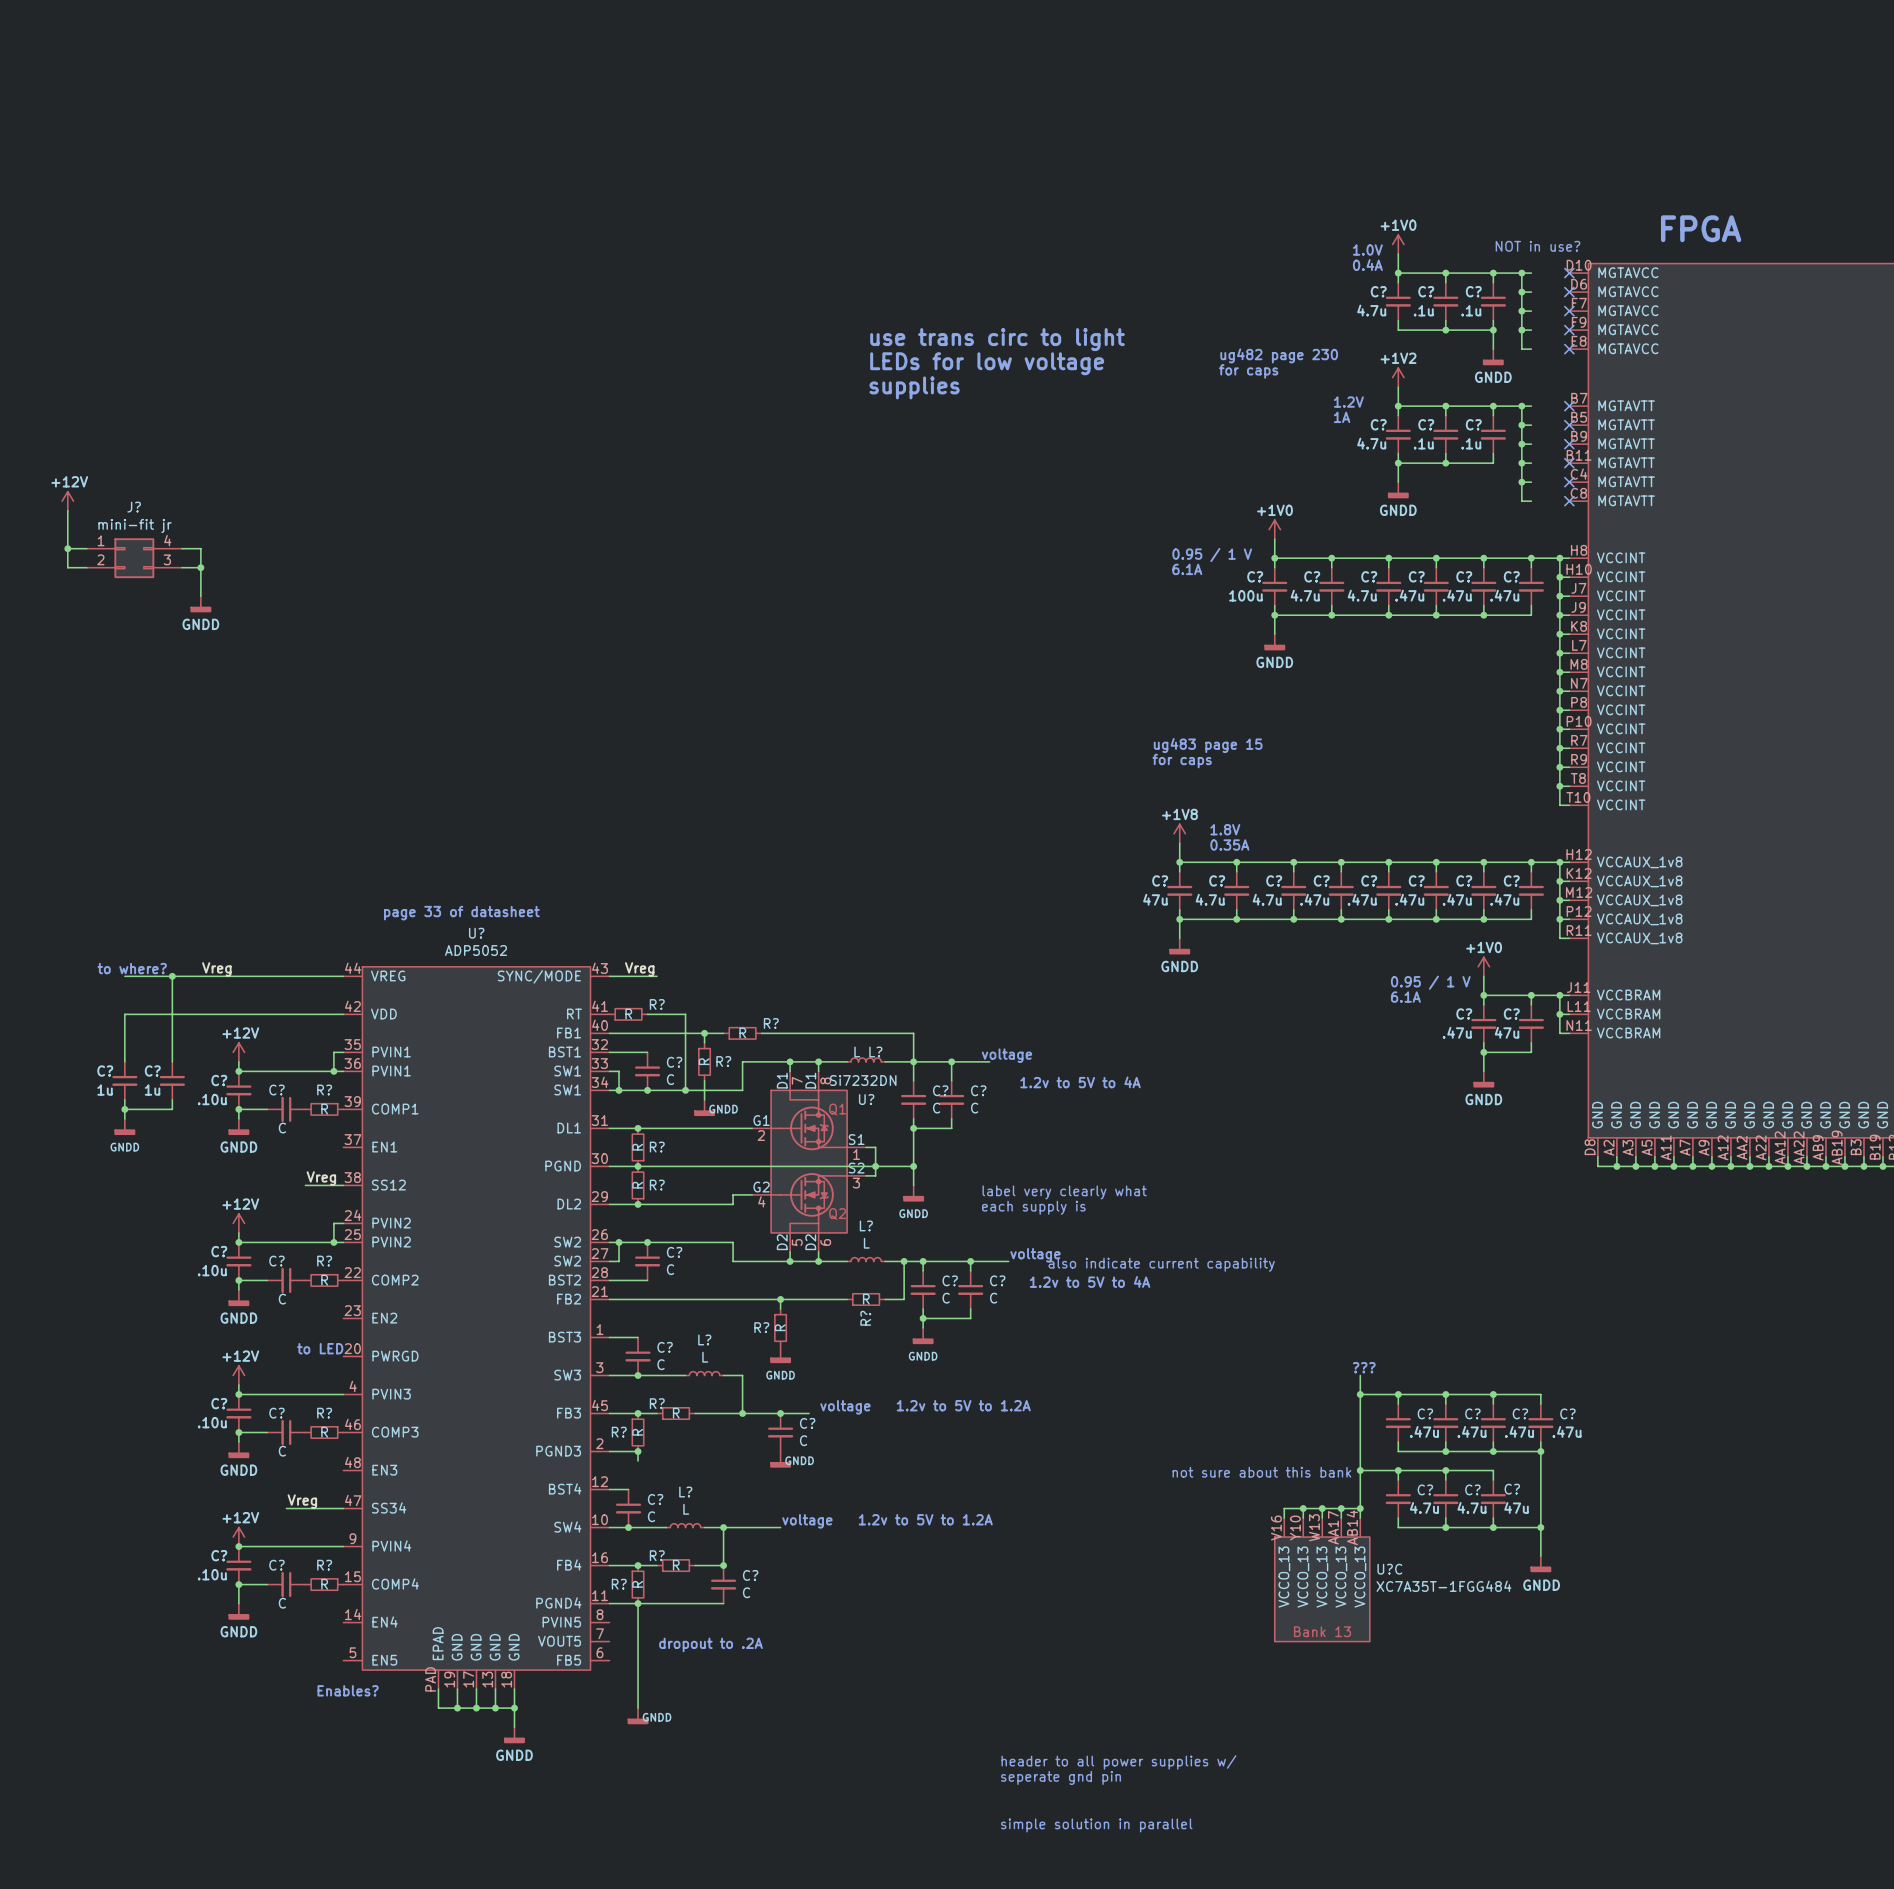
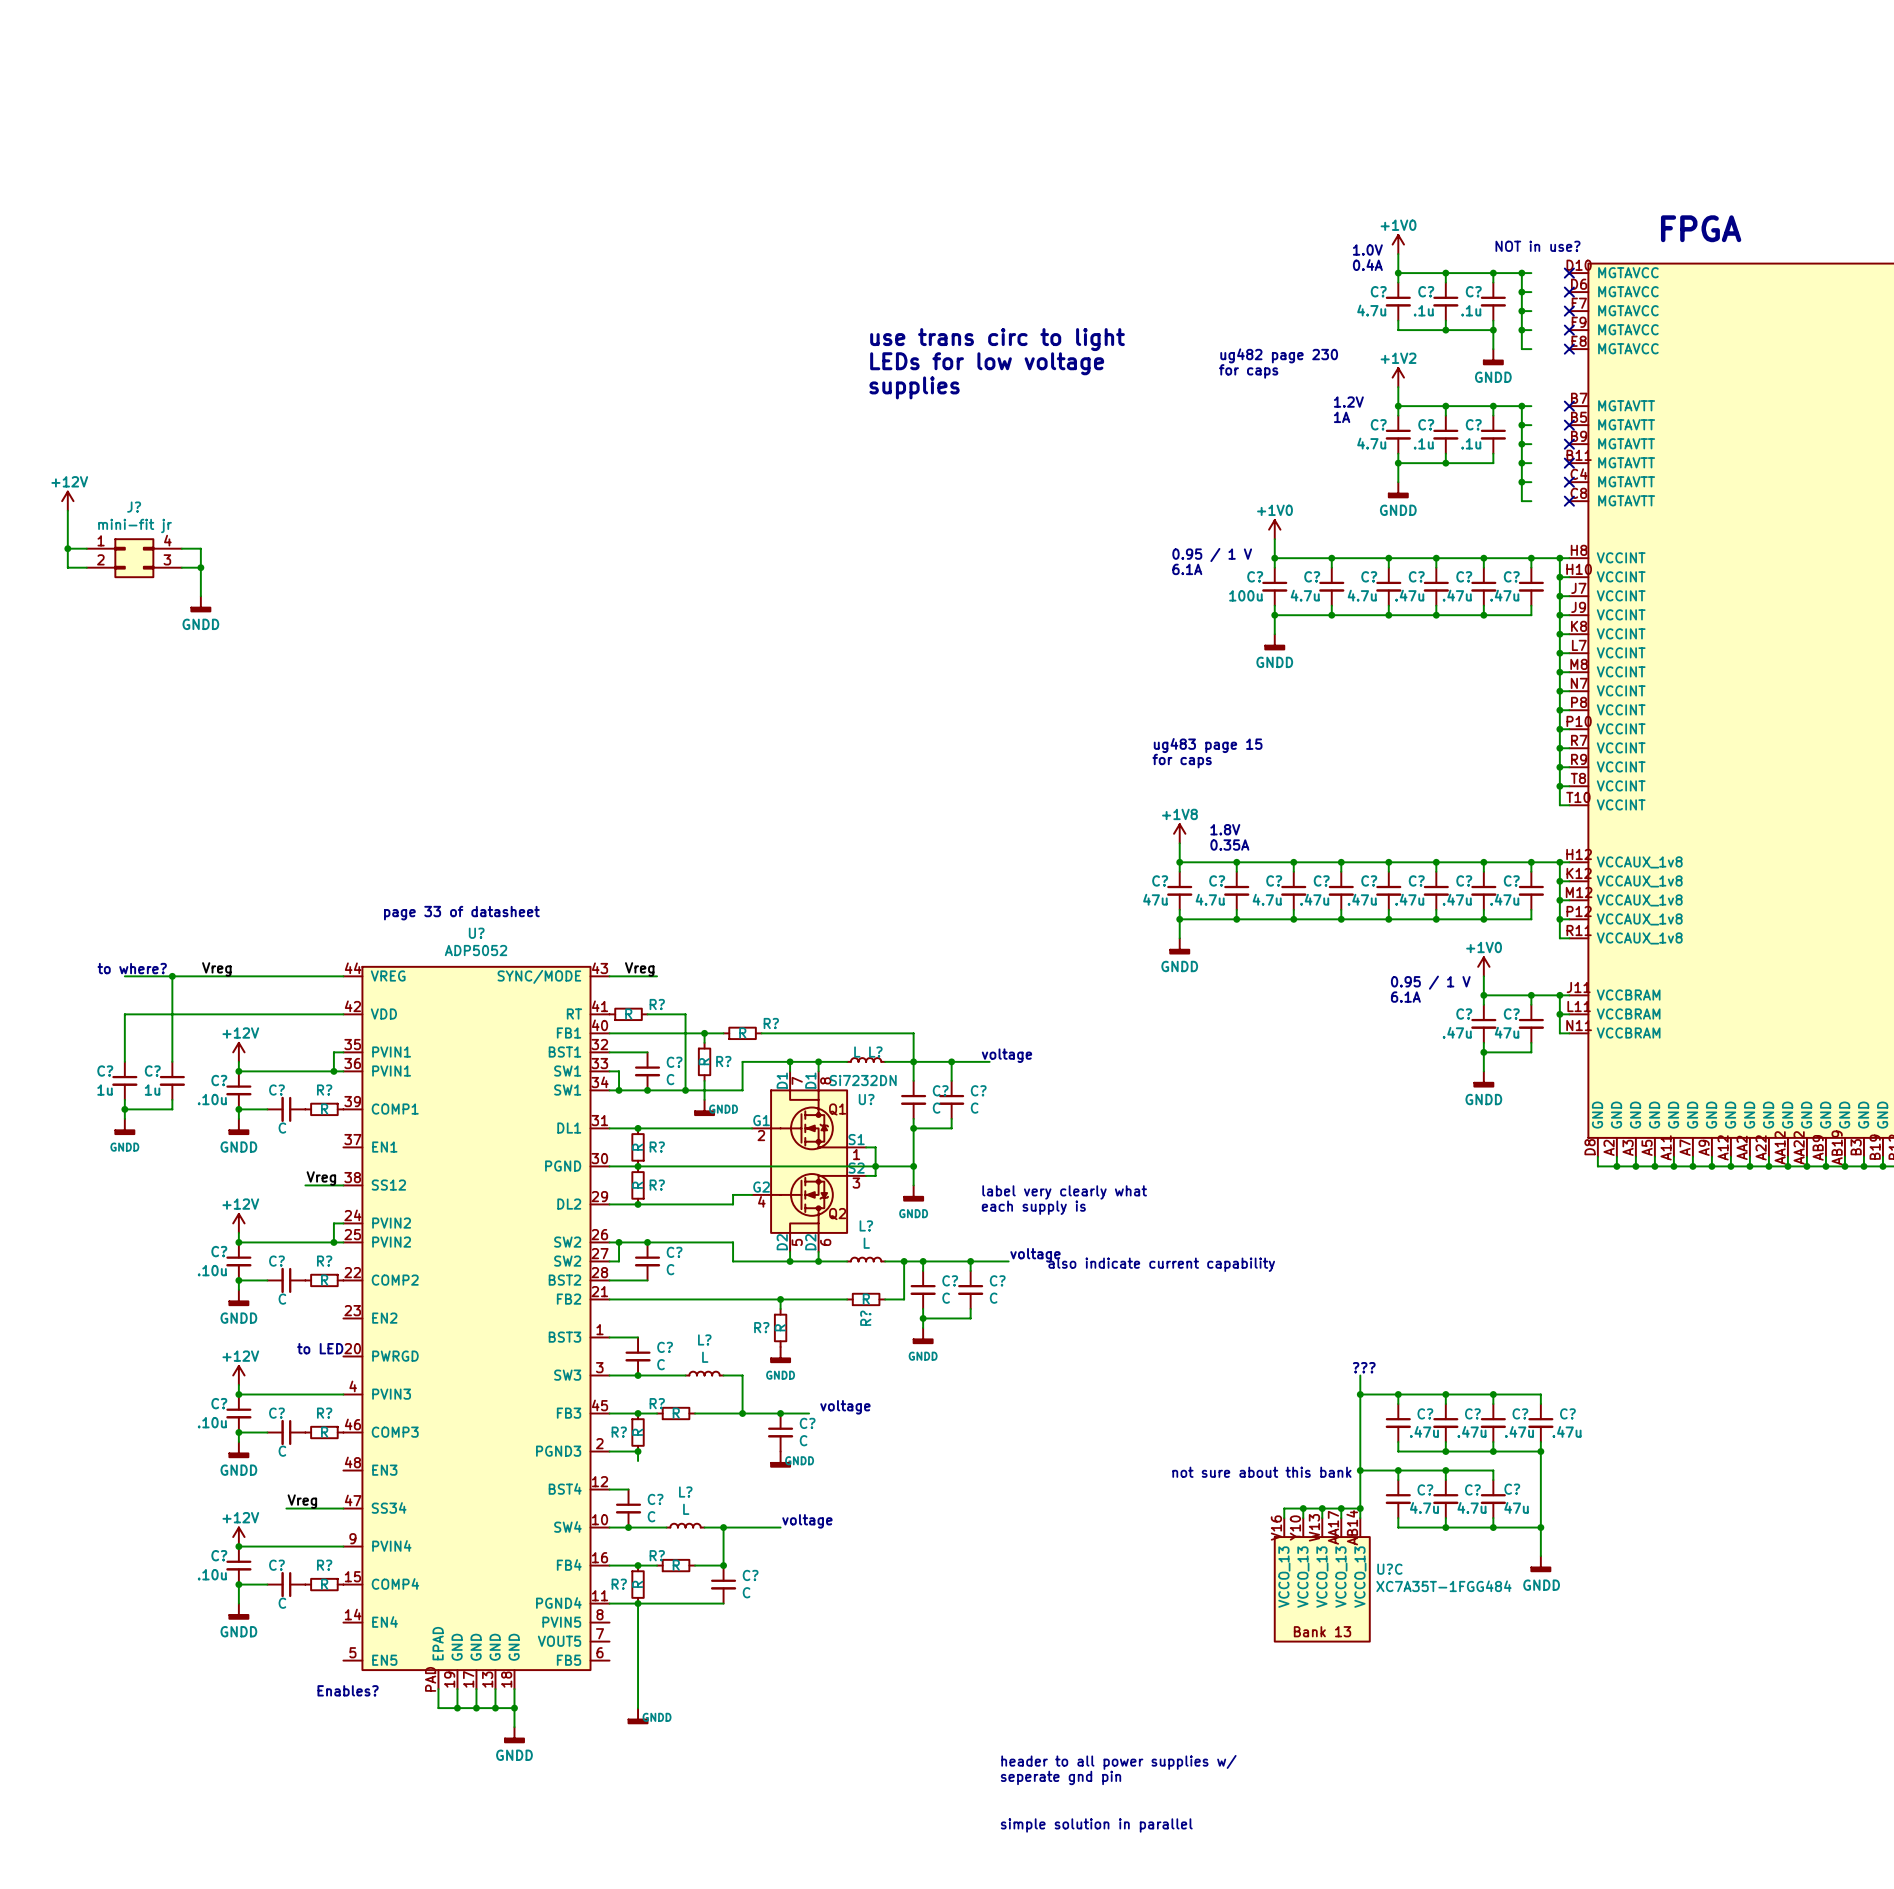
text: 1.2v to 5V to 4A (1080, 1082) -> none
text: 1.2v to 5V to 4A (1090, 1281) -> none
text: 1.2v to 5V to 1.2A (963, 1405) -> none
text: 1.2v to 5V to 1.2A (925, 1519) -> none
text: dropout to .2A (711, 1644) -> none

